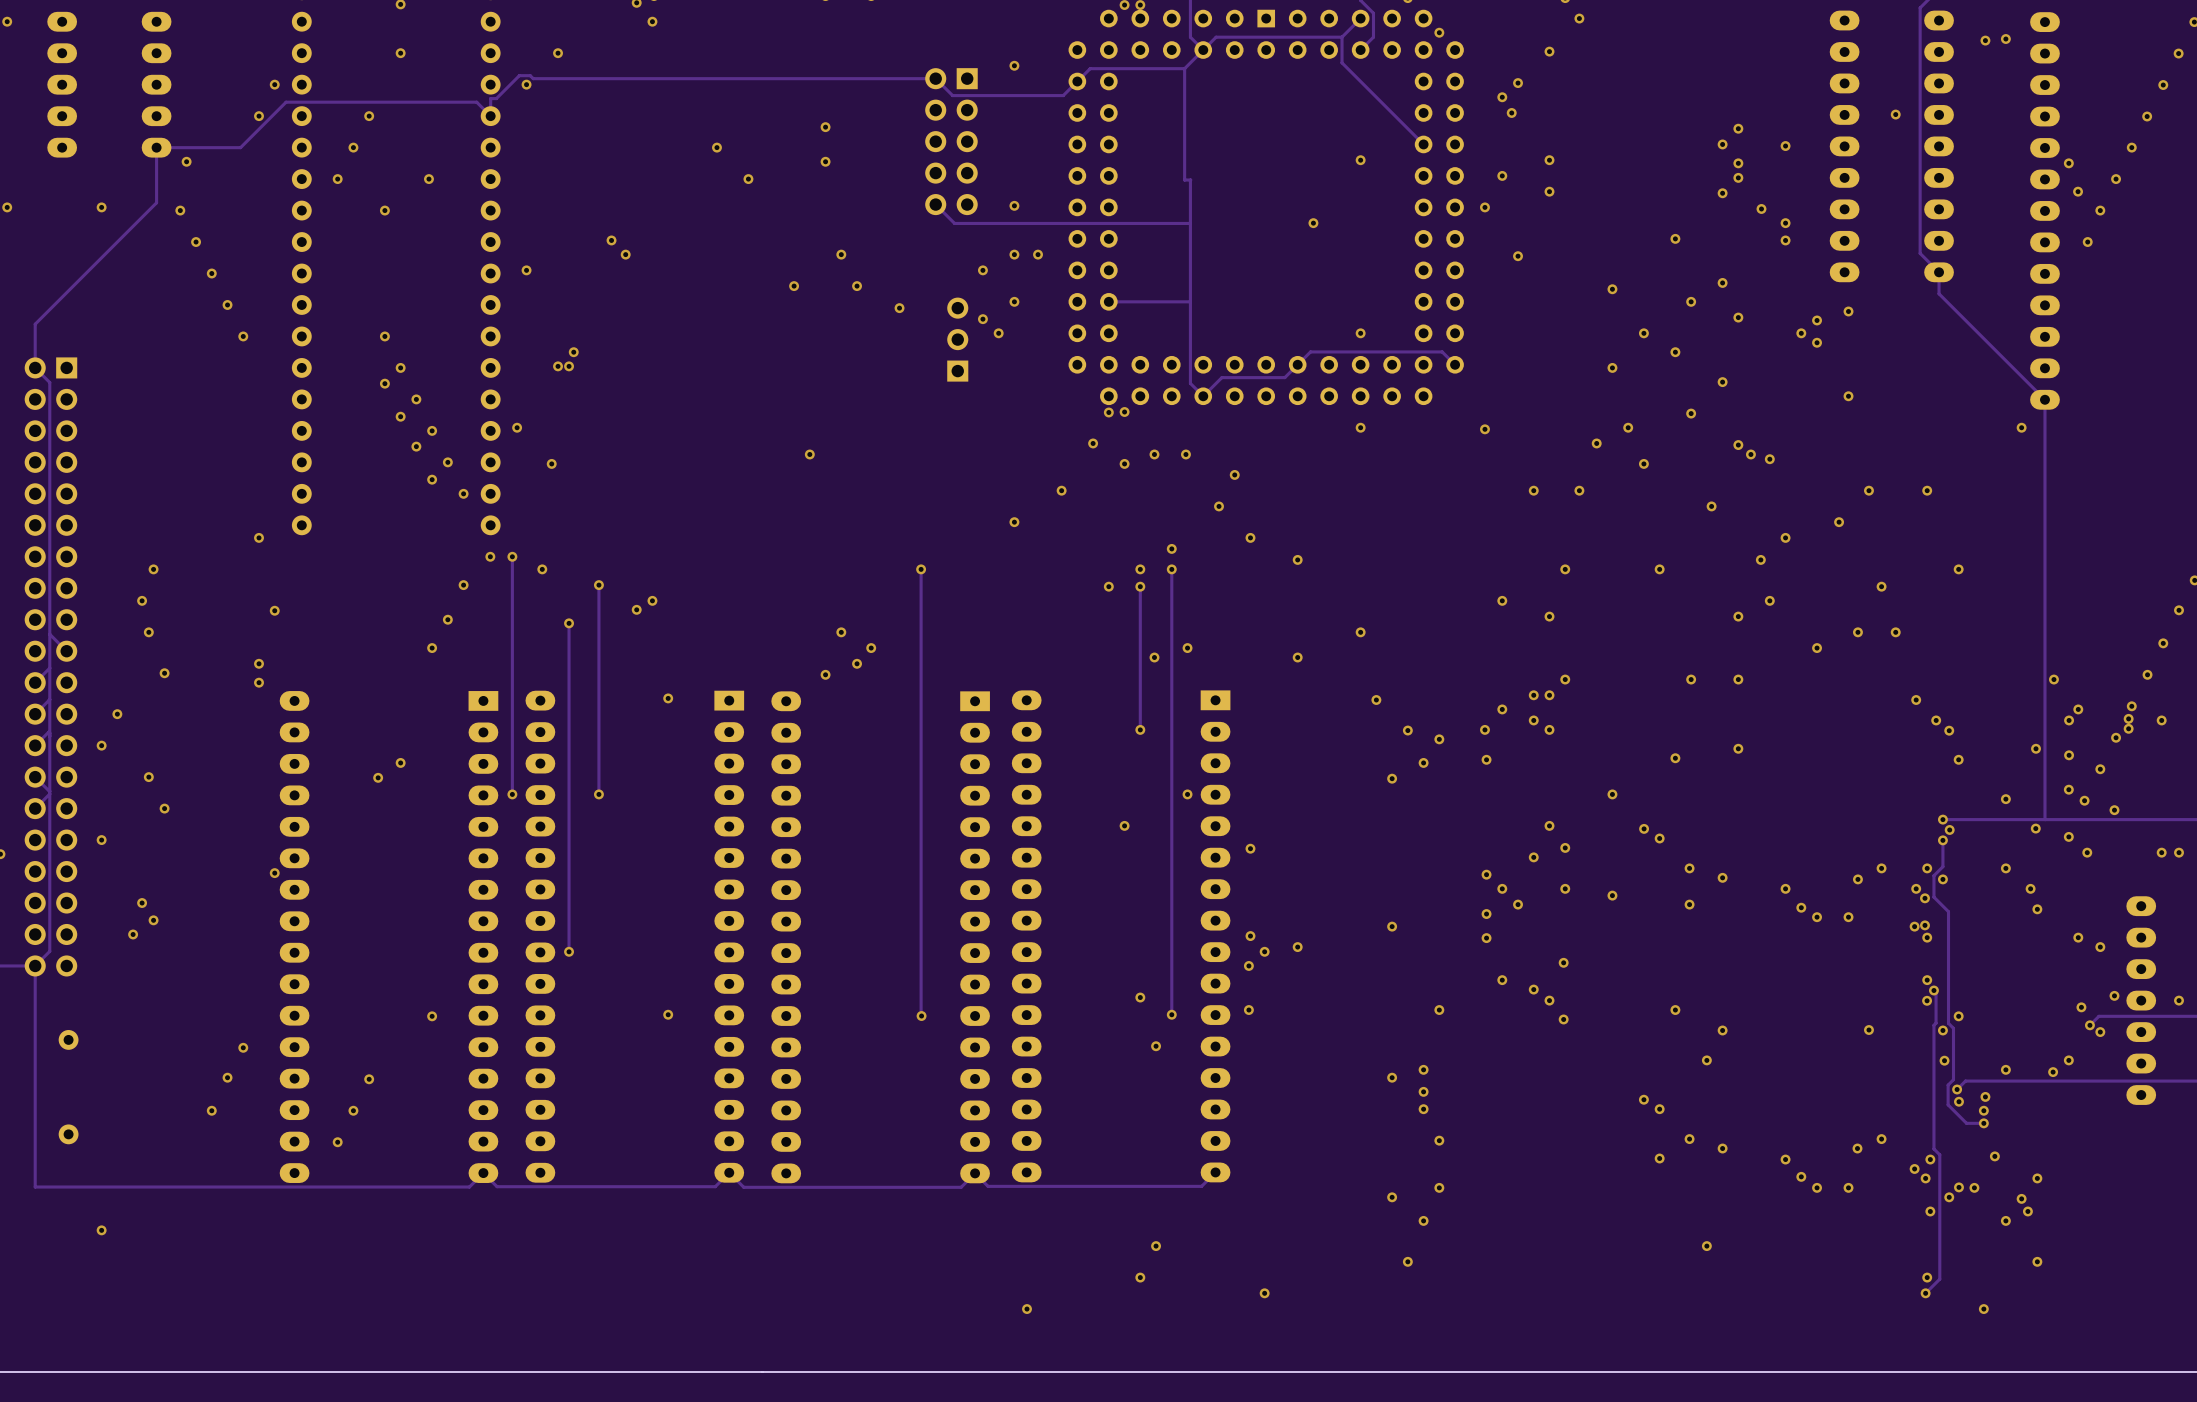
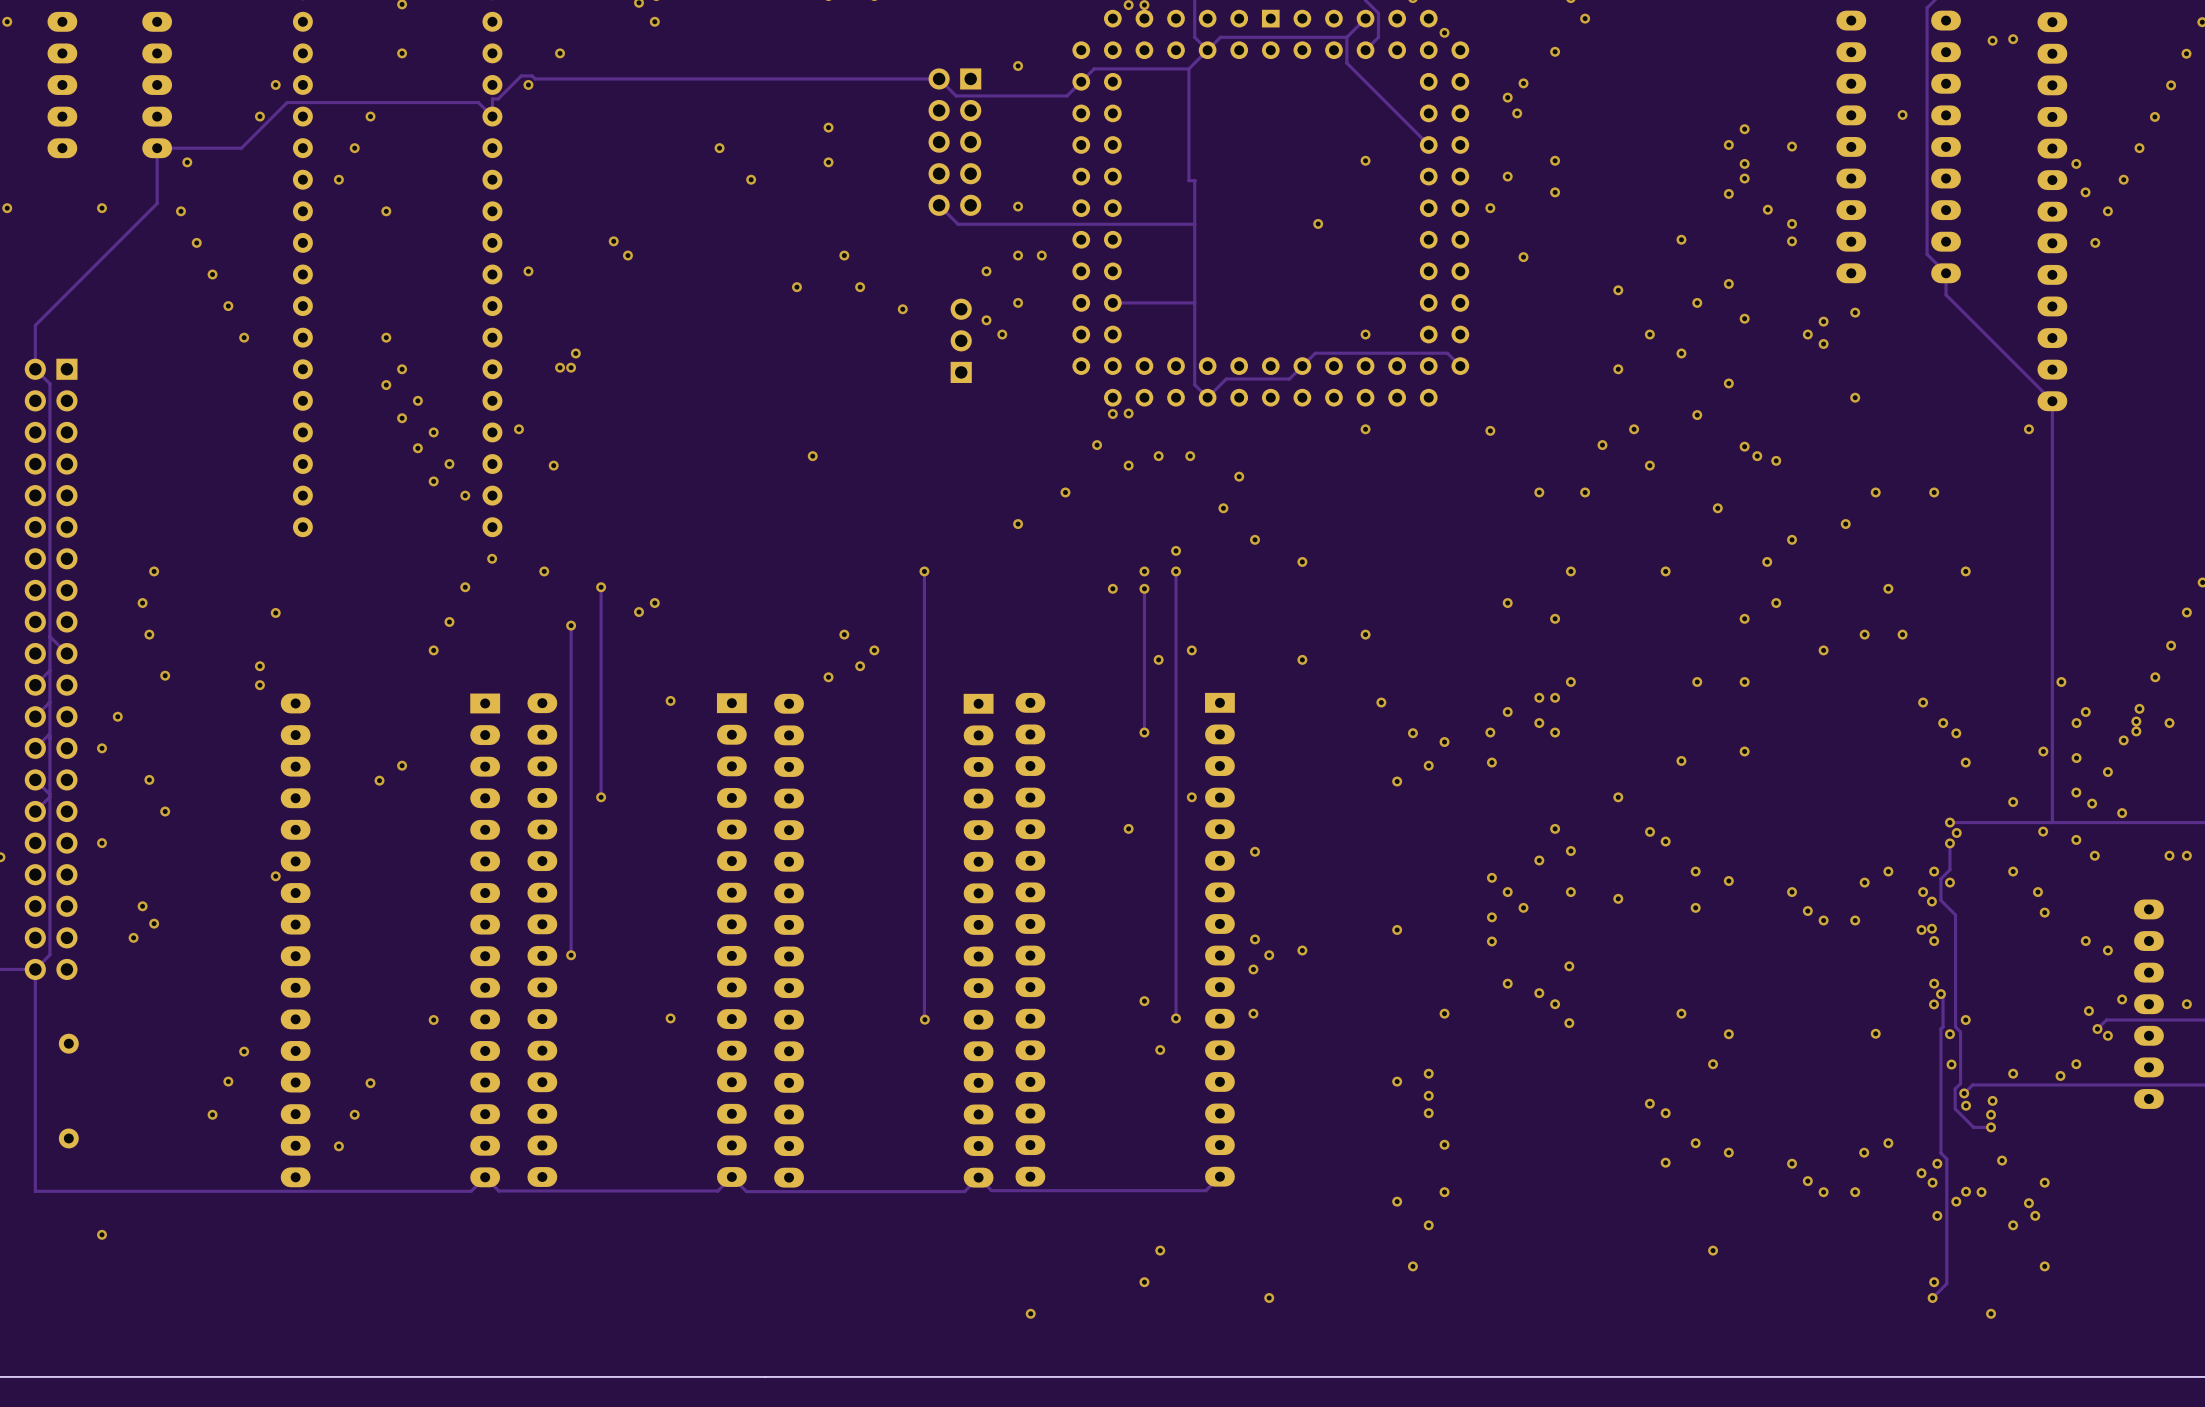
via: (428, 179) -> none
via: (259, 537) -> none
track: (512, 556) (512, 794) -> none
via: (512, 556) -> none
via: (512, 794) -> none

